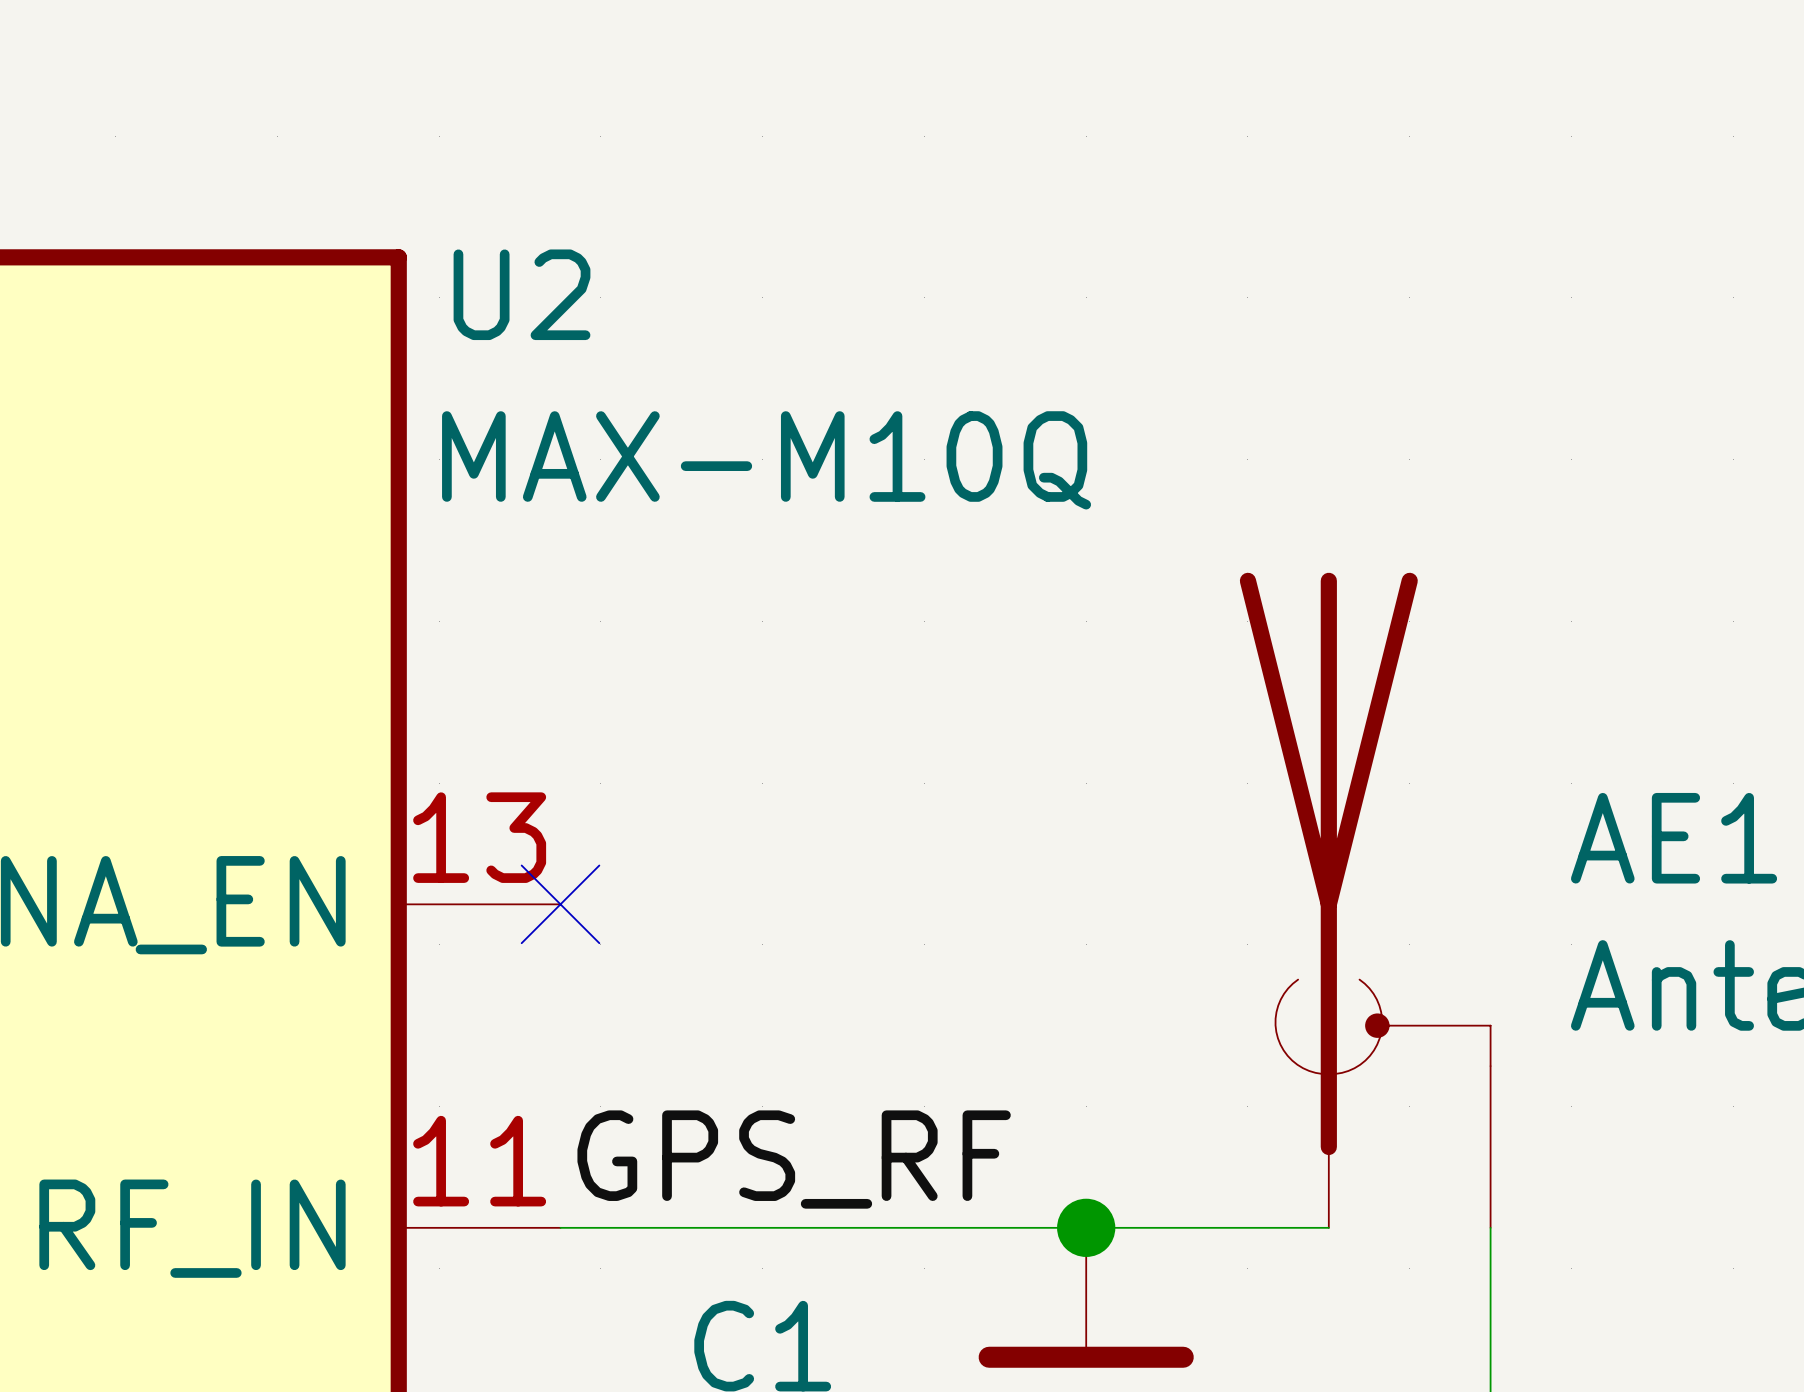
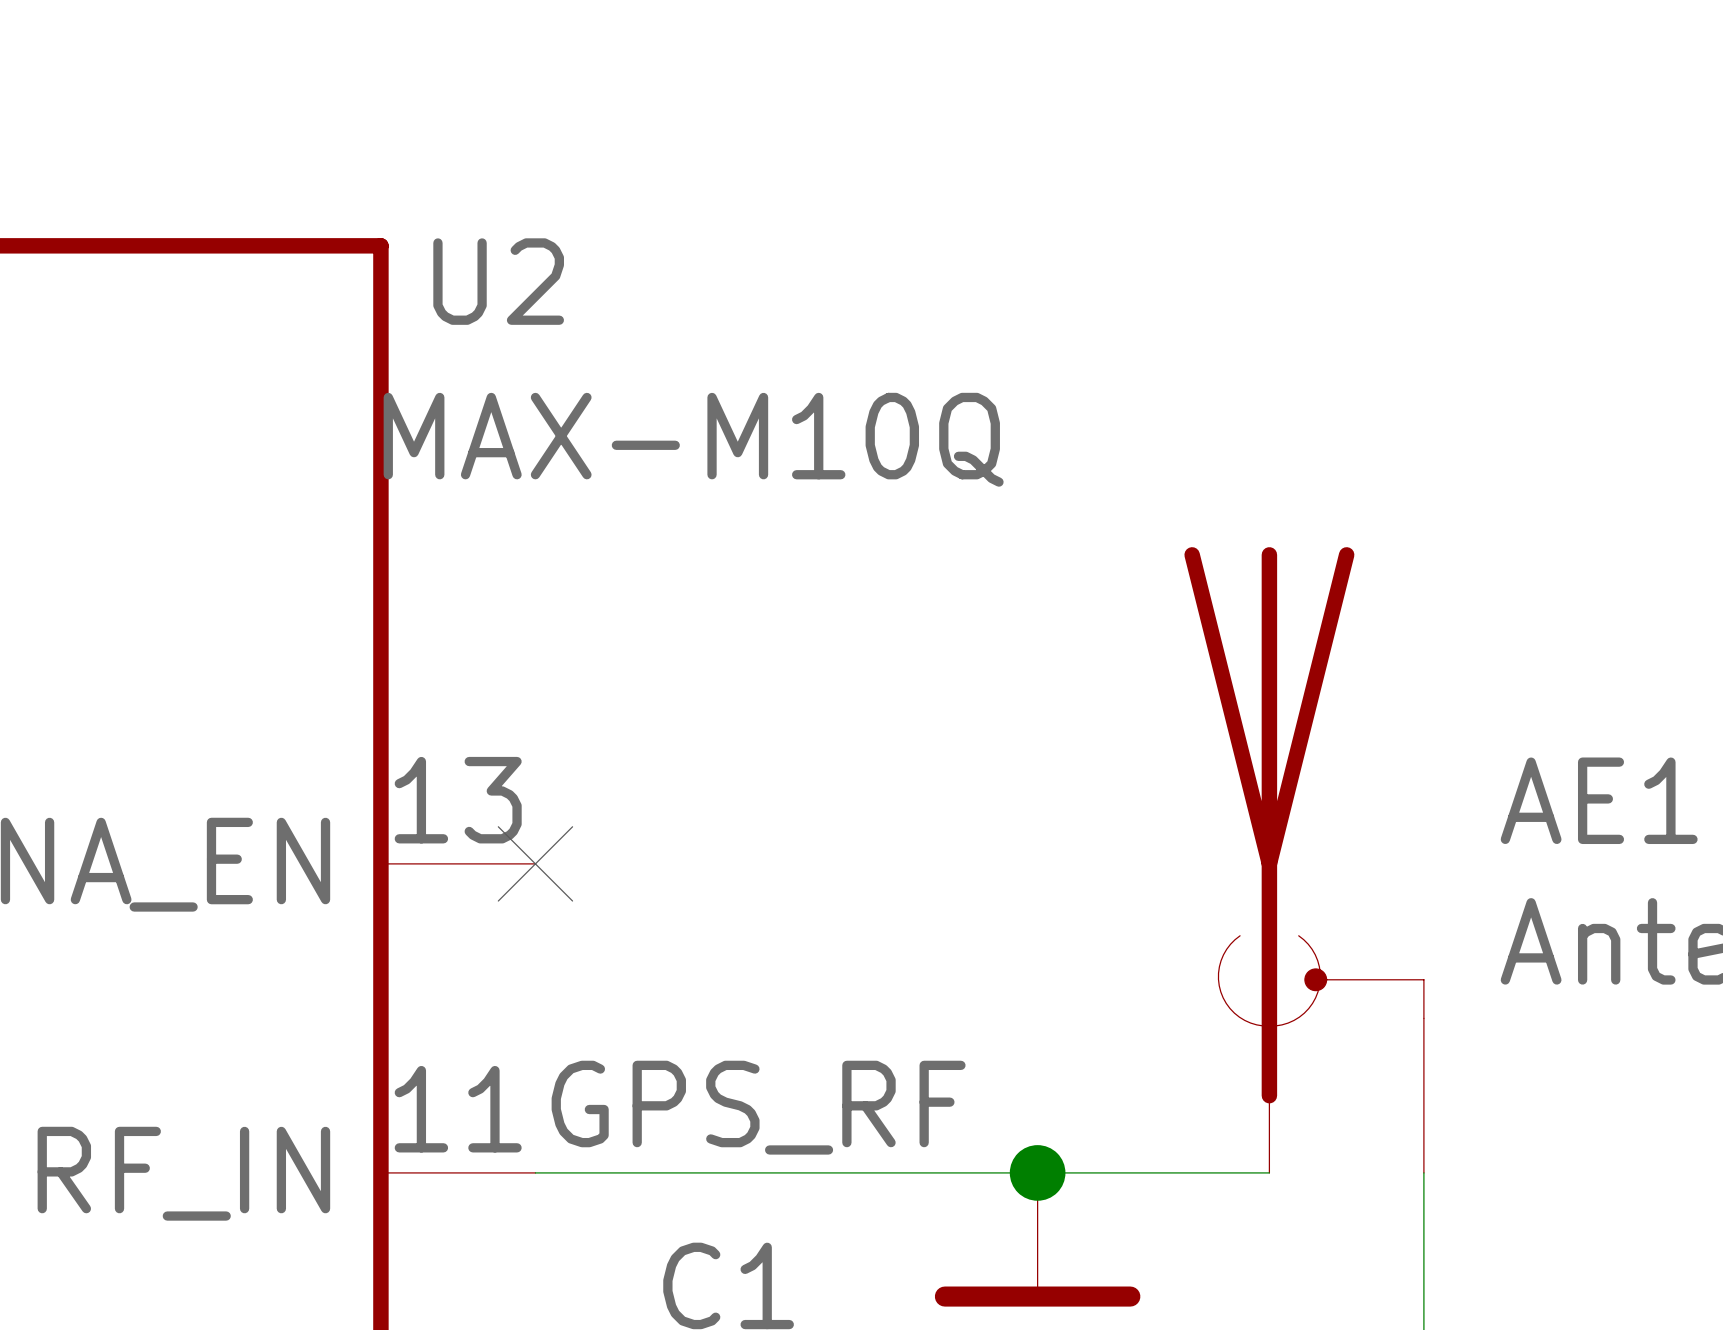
U2 value position: MAX-M10Q (766, 460) -> MAX-M10Q (693, 439)

